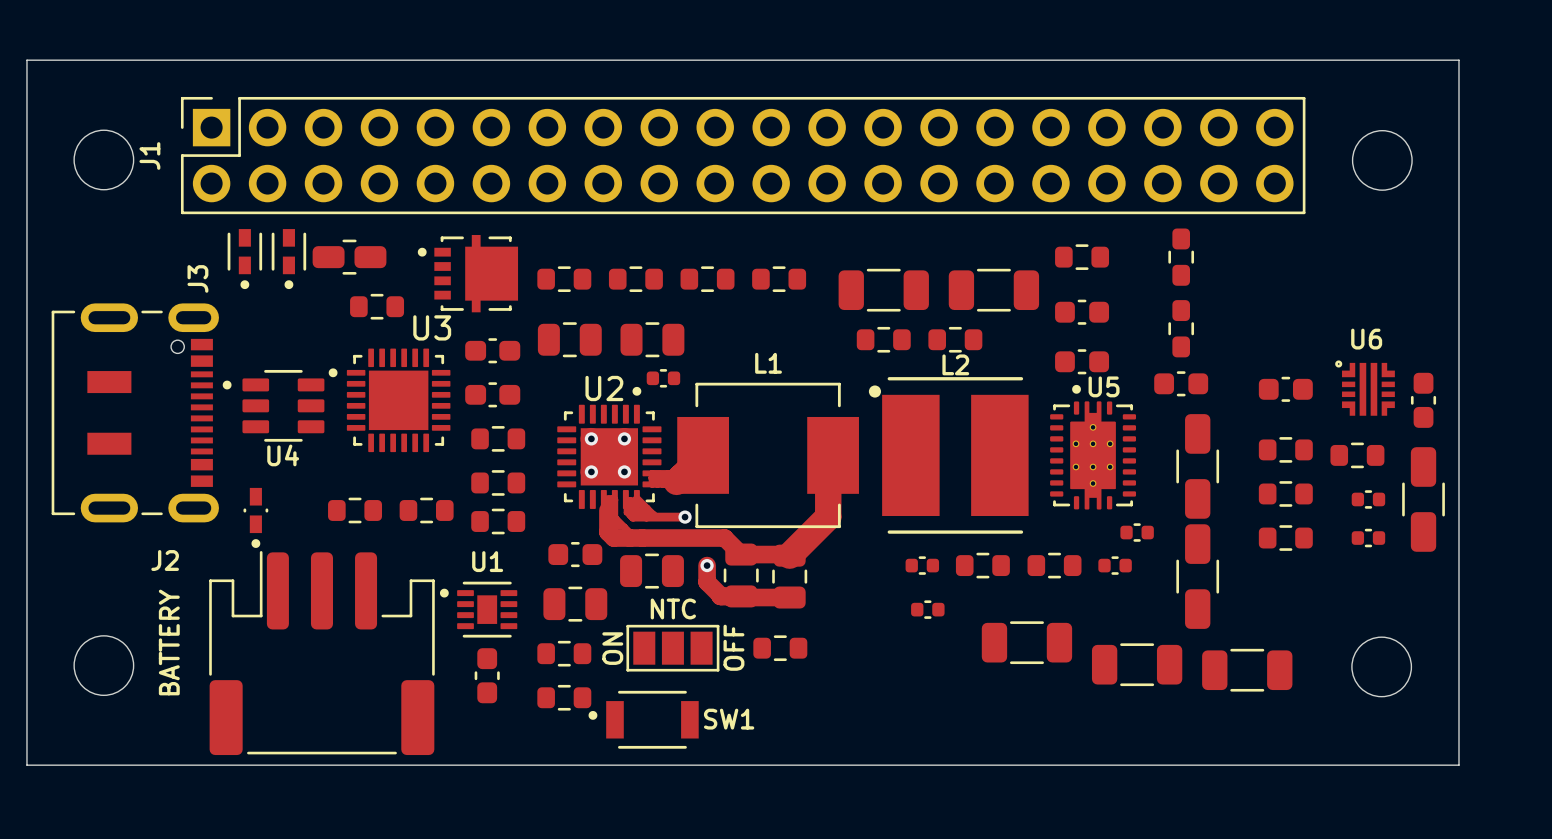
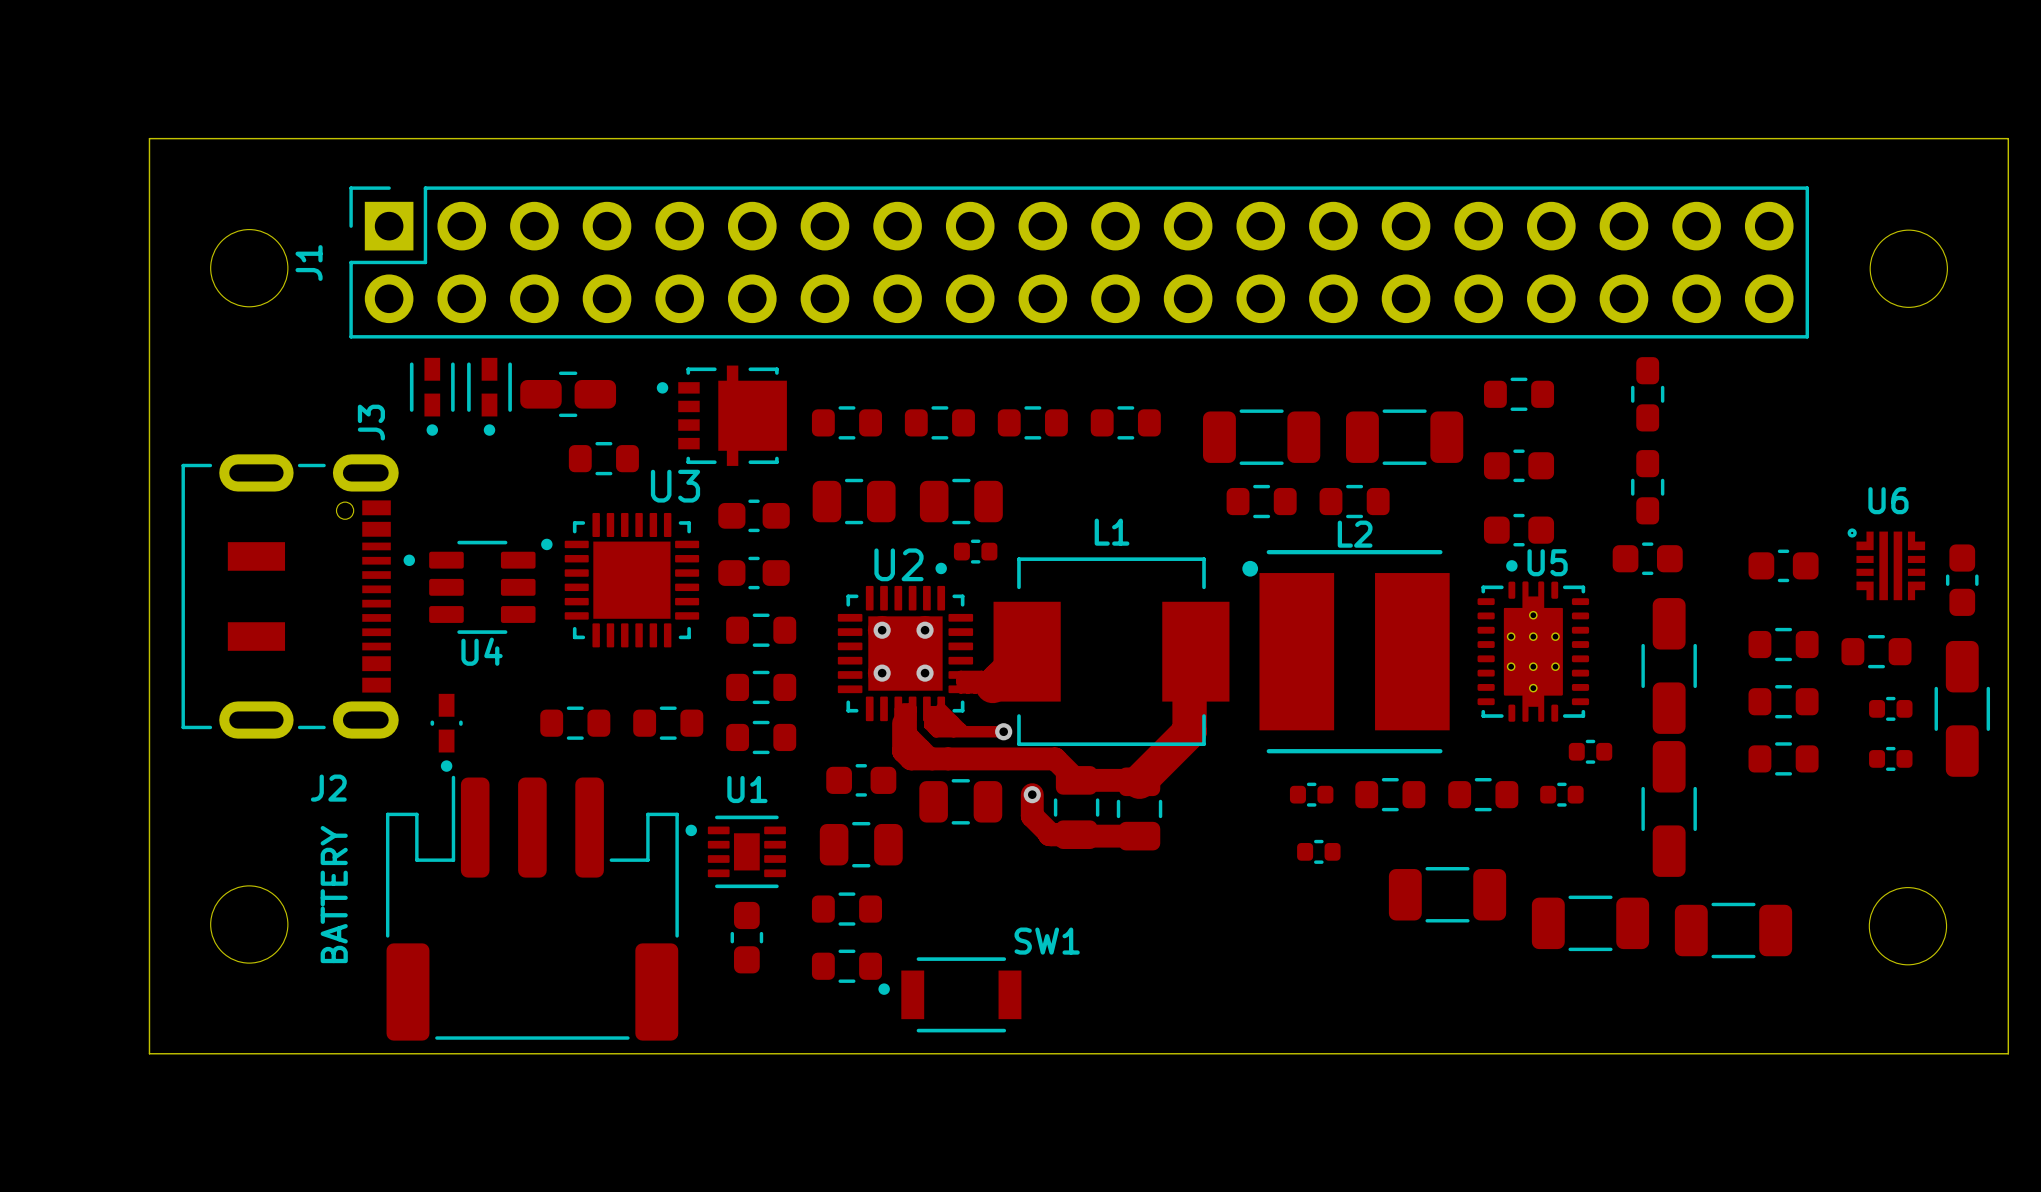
part: (672, 648) -> none
part: (780, 648) -> none
SW1 name position: SW1 (729, 719) -> SW1 (1047, 941)

